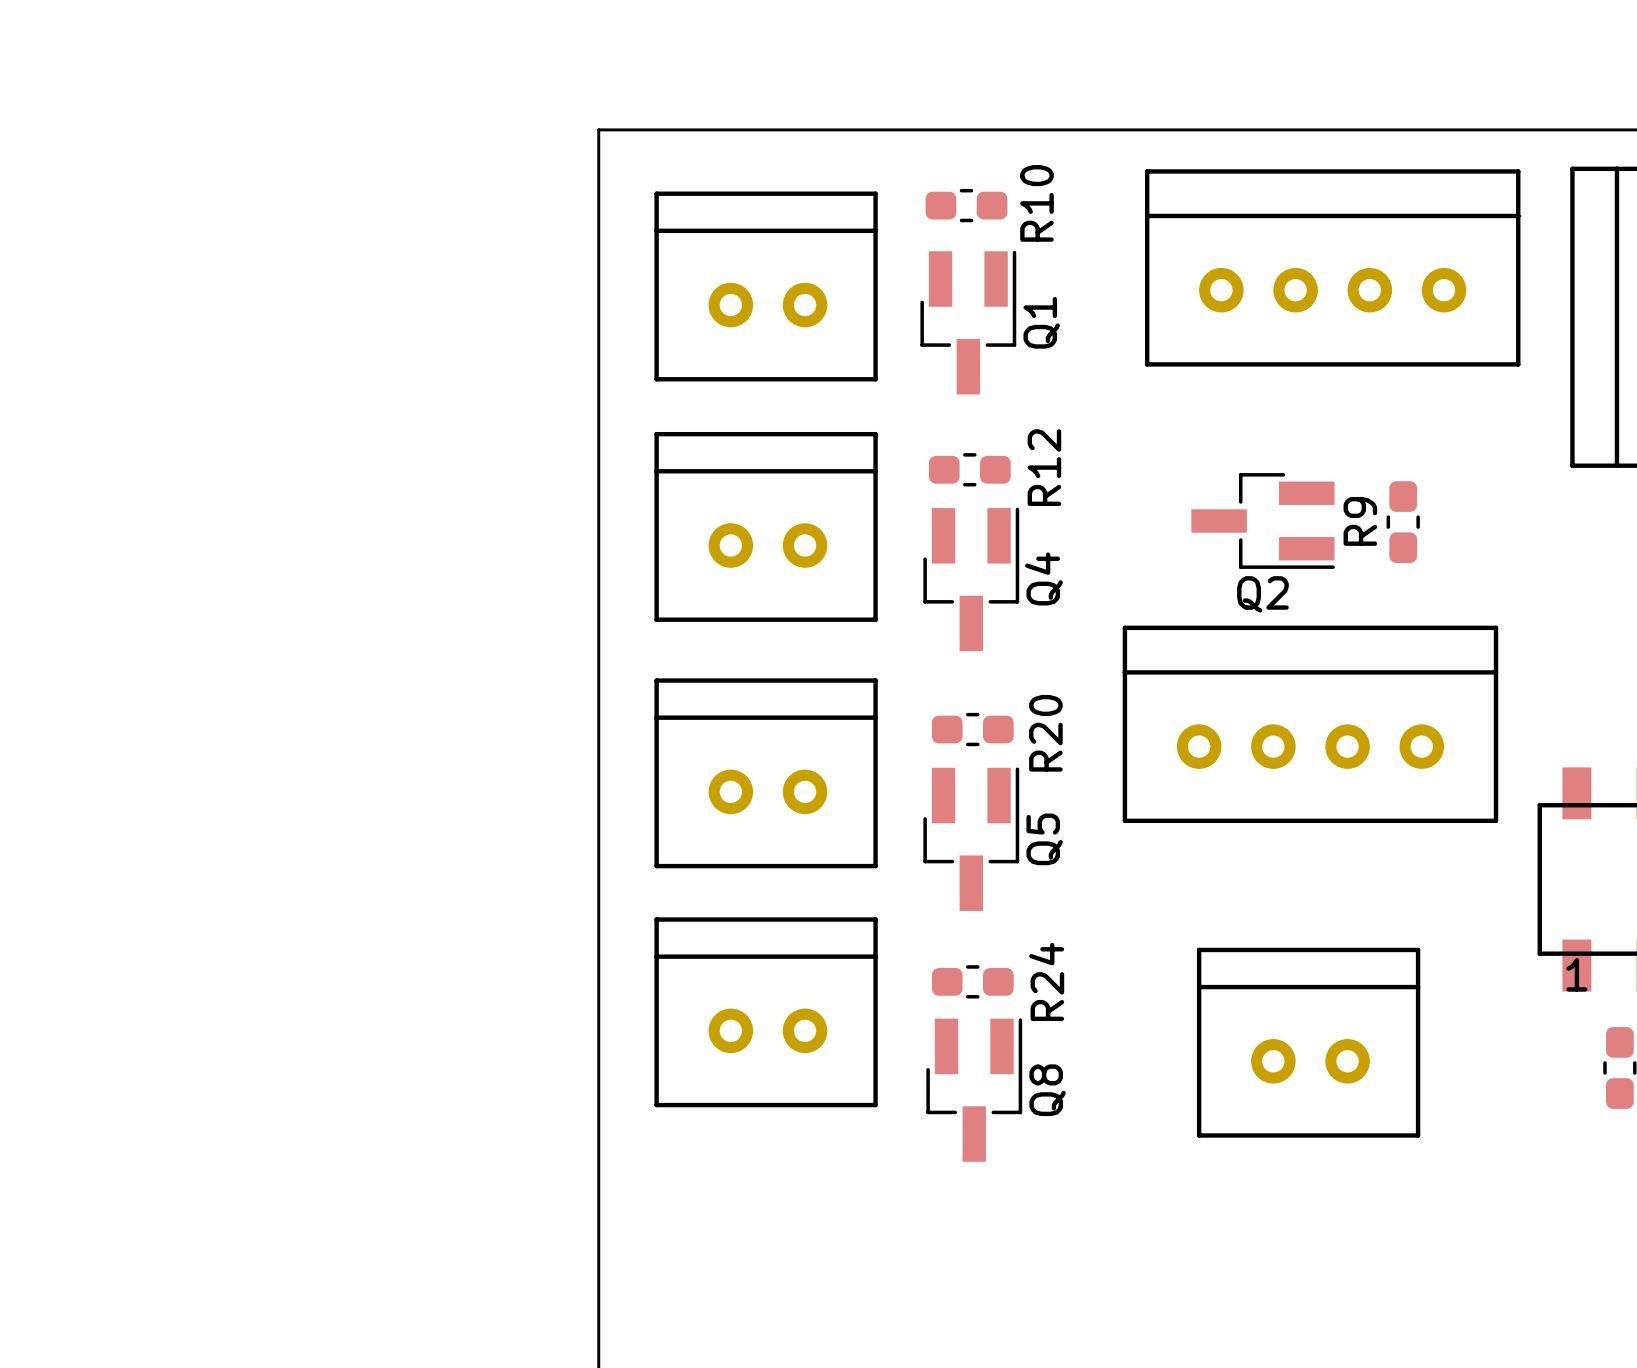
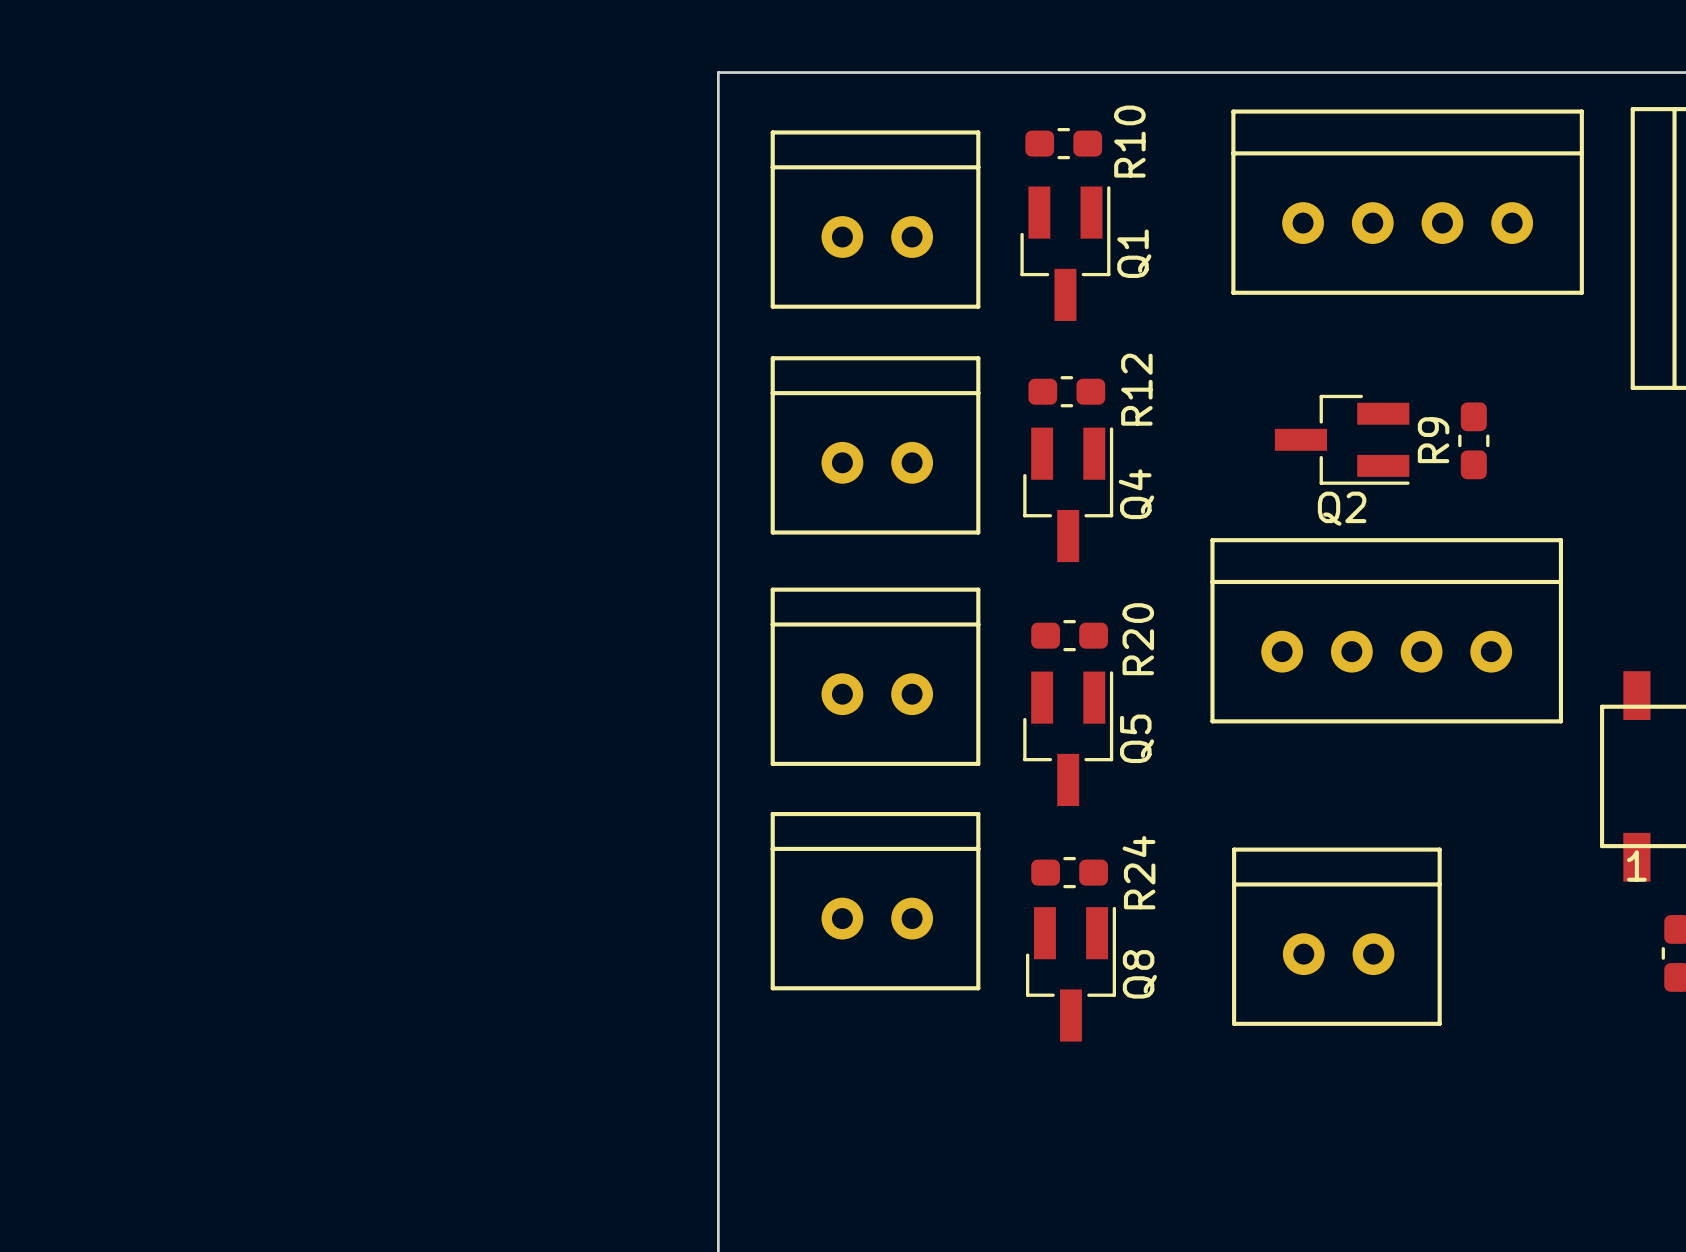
part position: (1308, 1042) -> (1336, 936)

